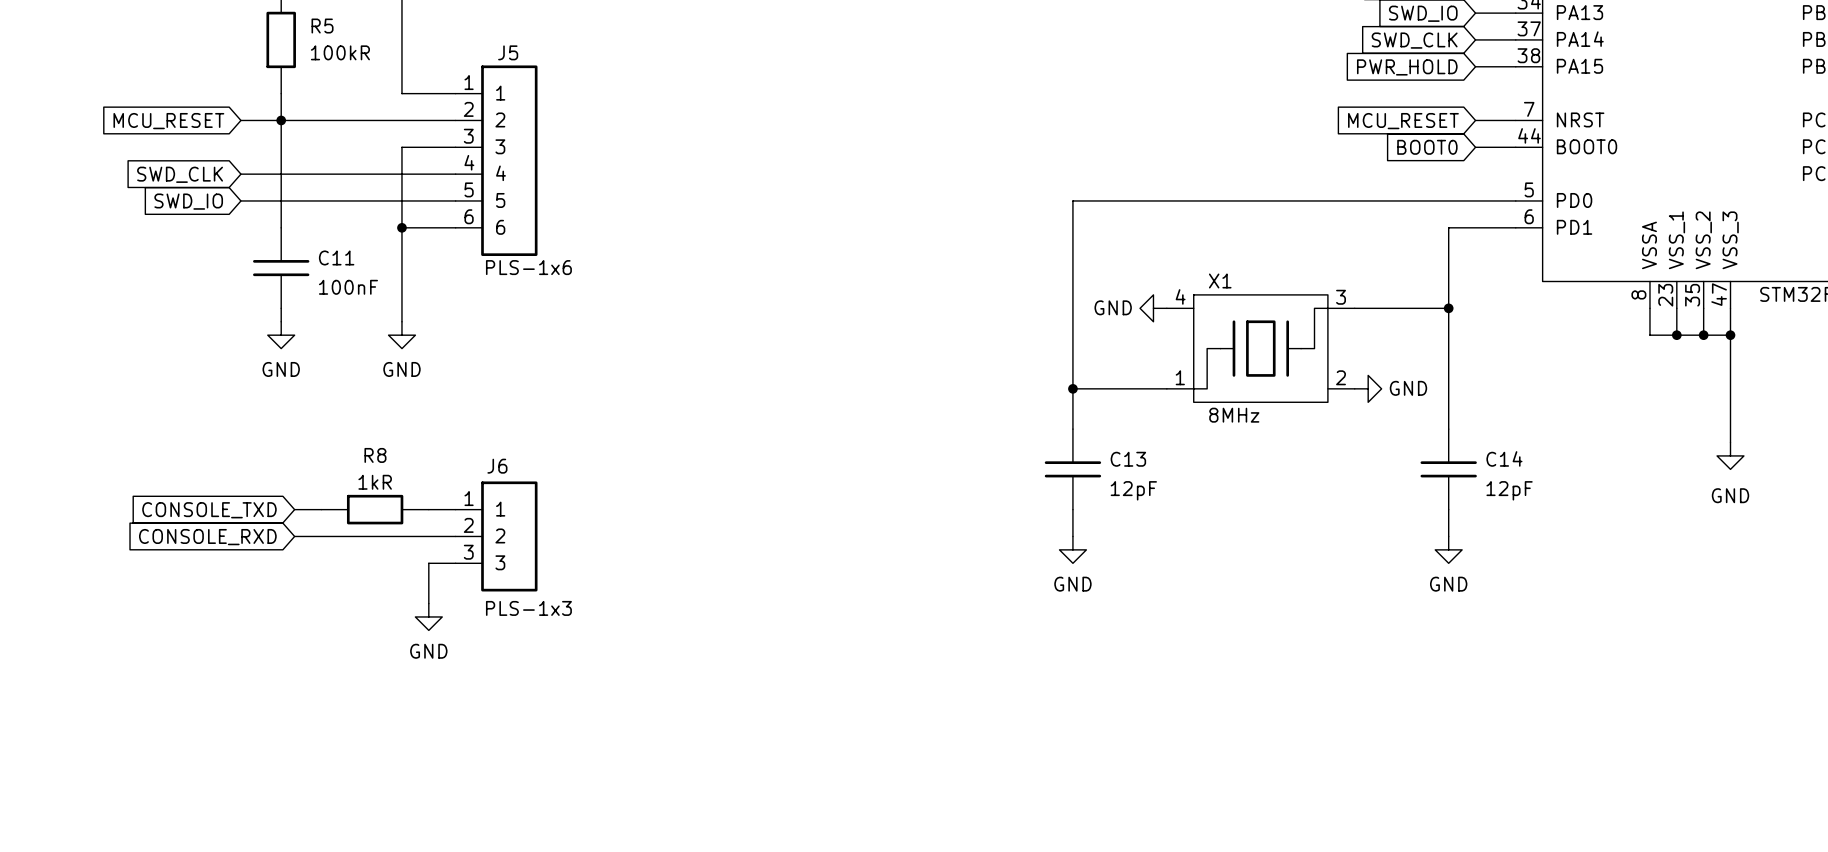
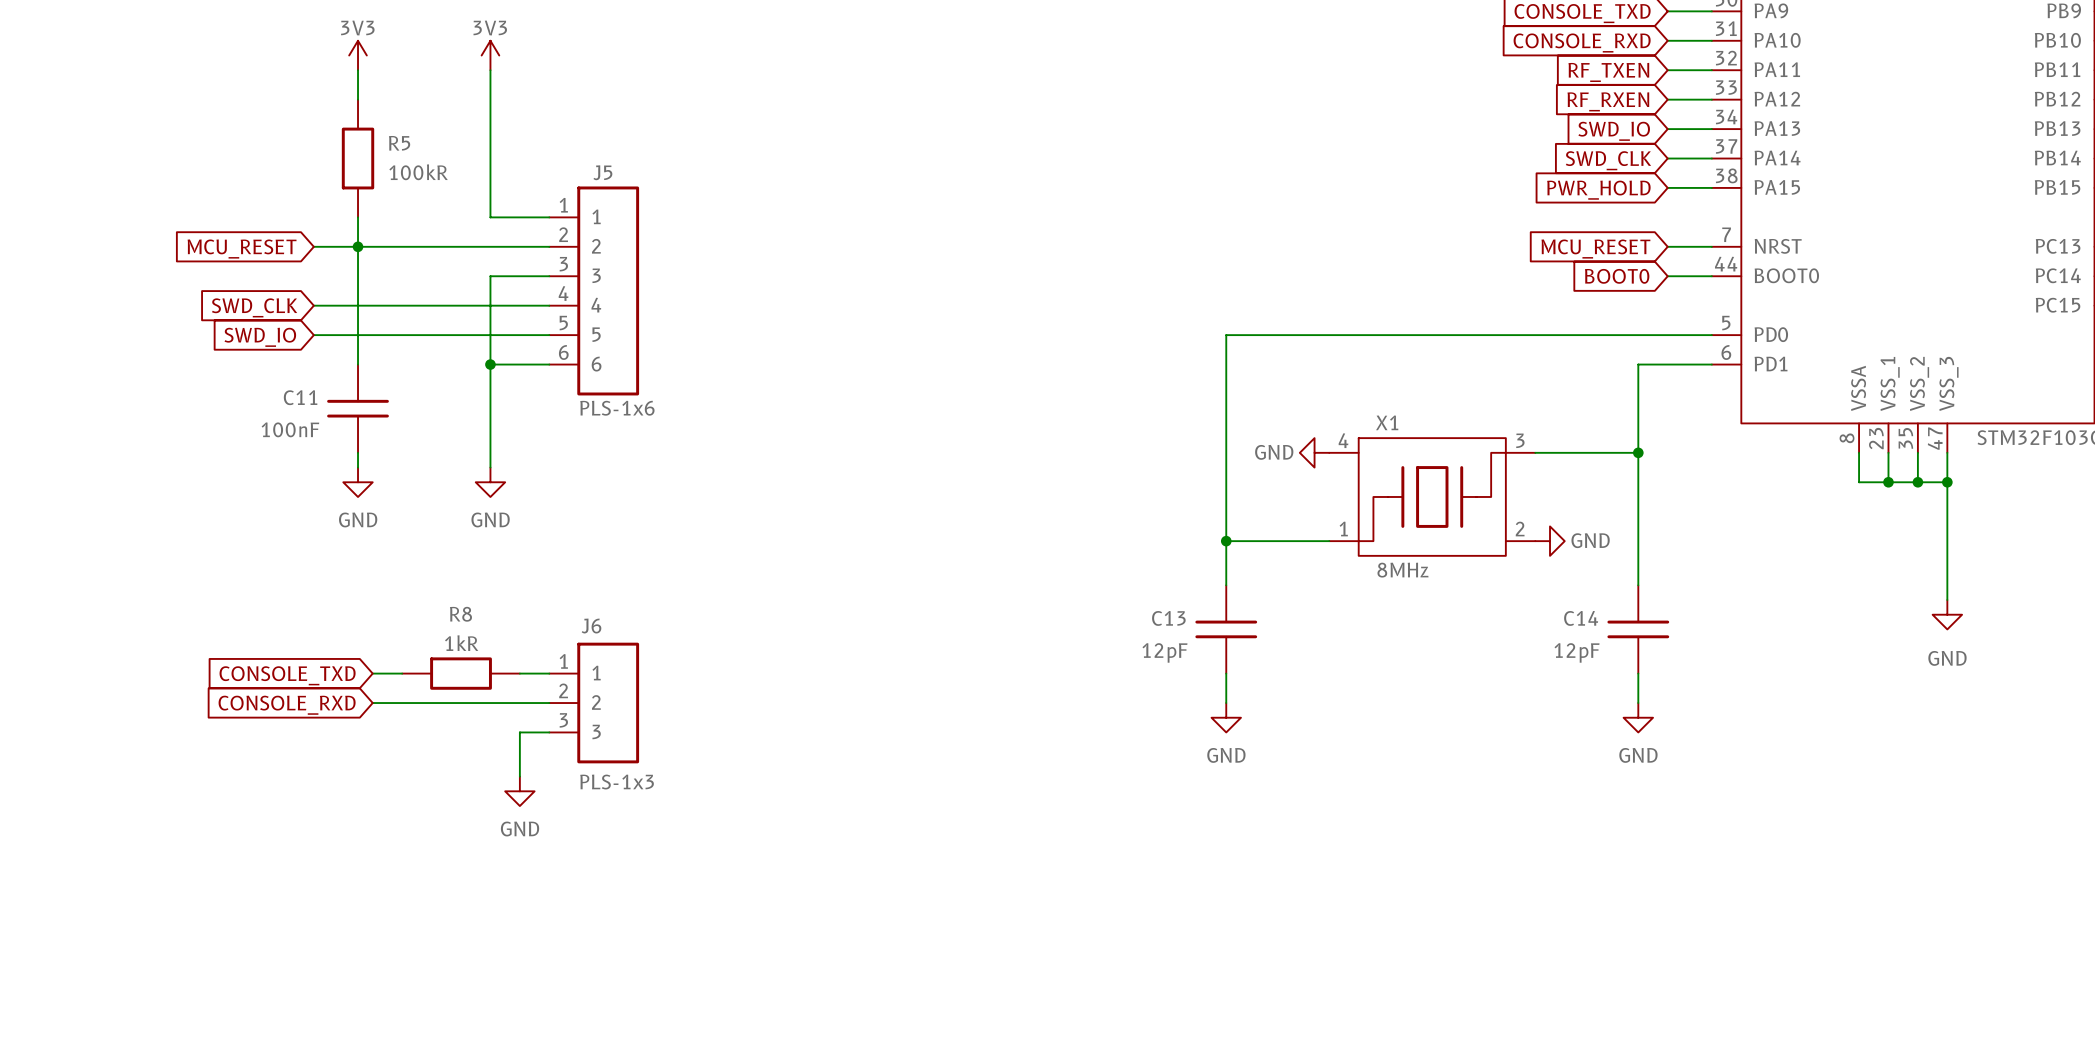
C11 name position: C11 (336, 257) -> C11 (300, 397)
C11 value position: 100nF (348, 287) -> 100nF (290, 429)
C14 name position: C14 (1504, 458) -> C14 (1581, 618)
C13 name position: C13 (1128, 459) -> C13 (1168, 618)
C13 value position: 12pF (1133, 490) -> 12pF (1164, 652)
C14 value position: 12pF (1509, 490) -> 12pF (1577, 652)

